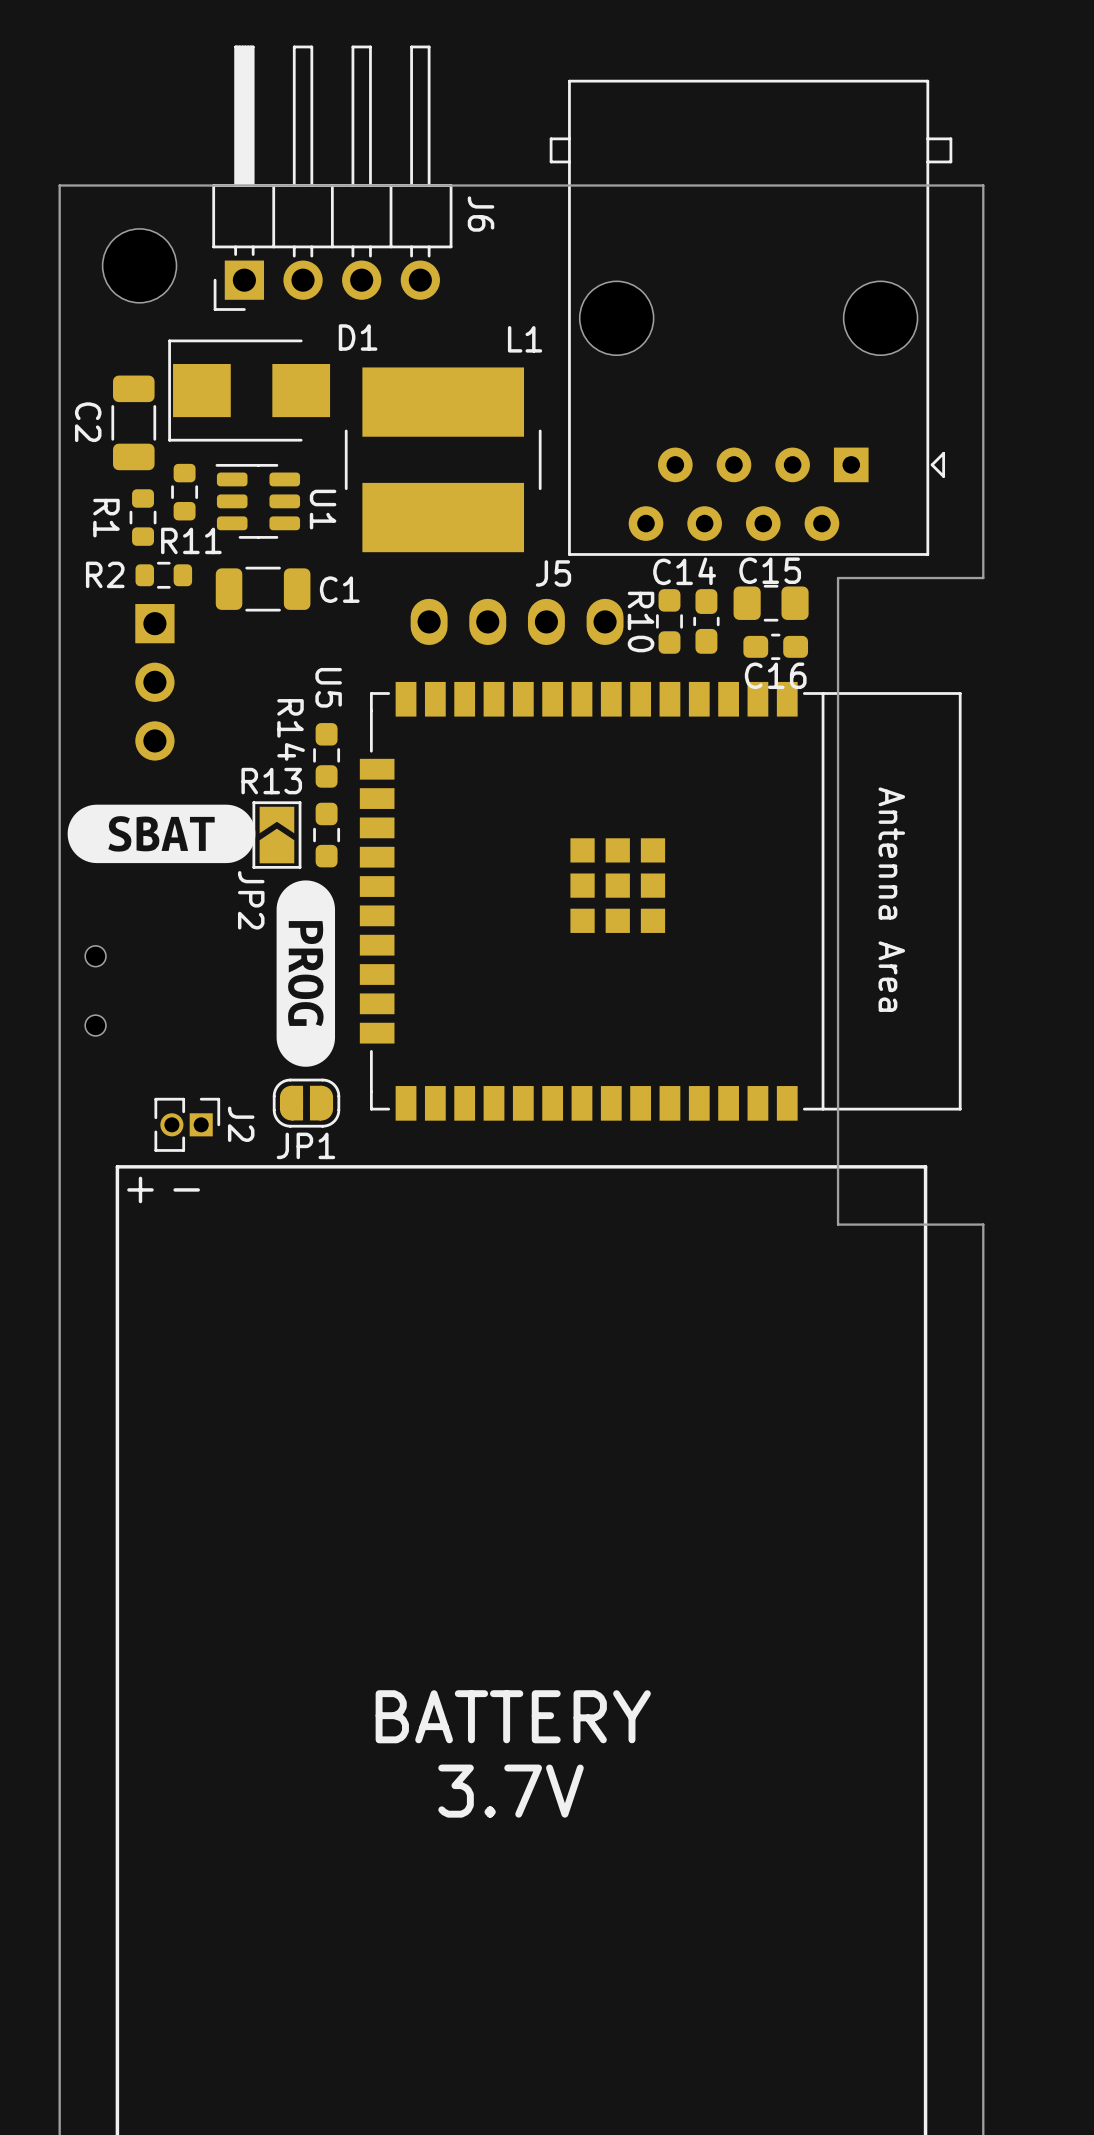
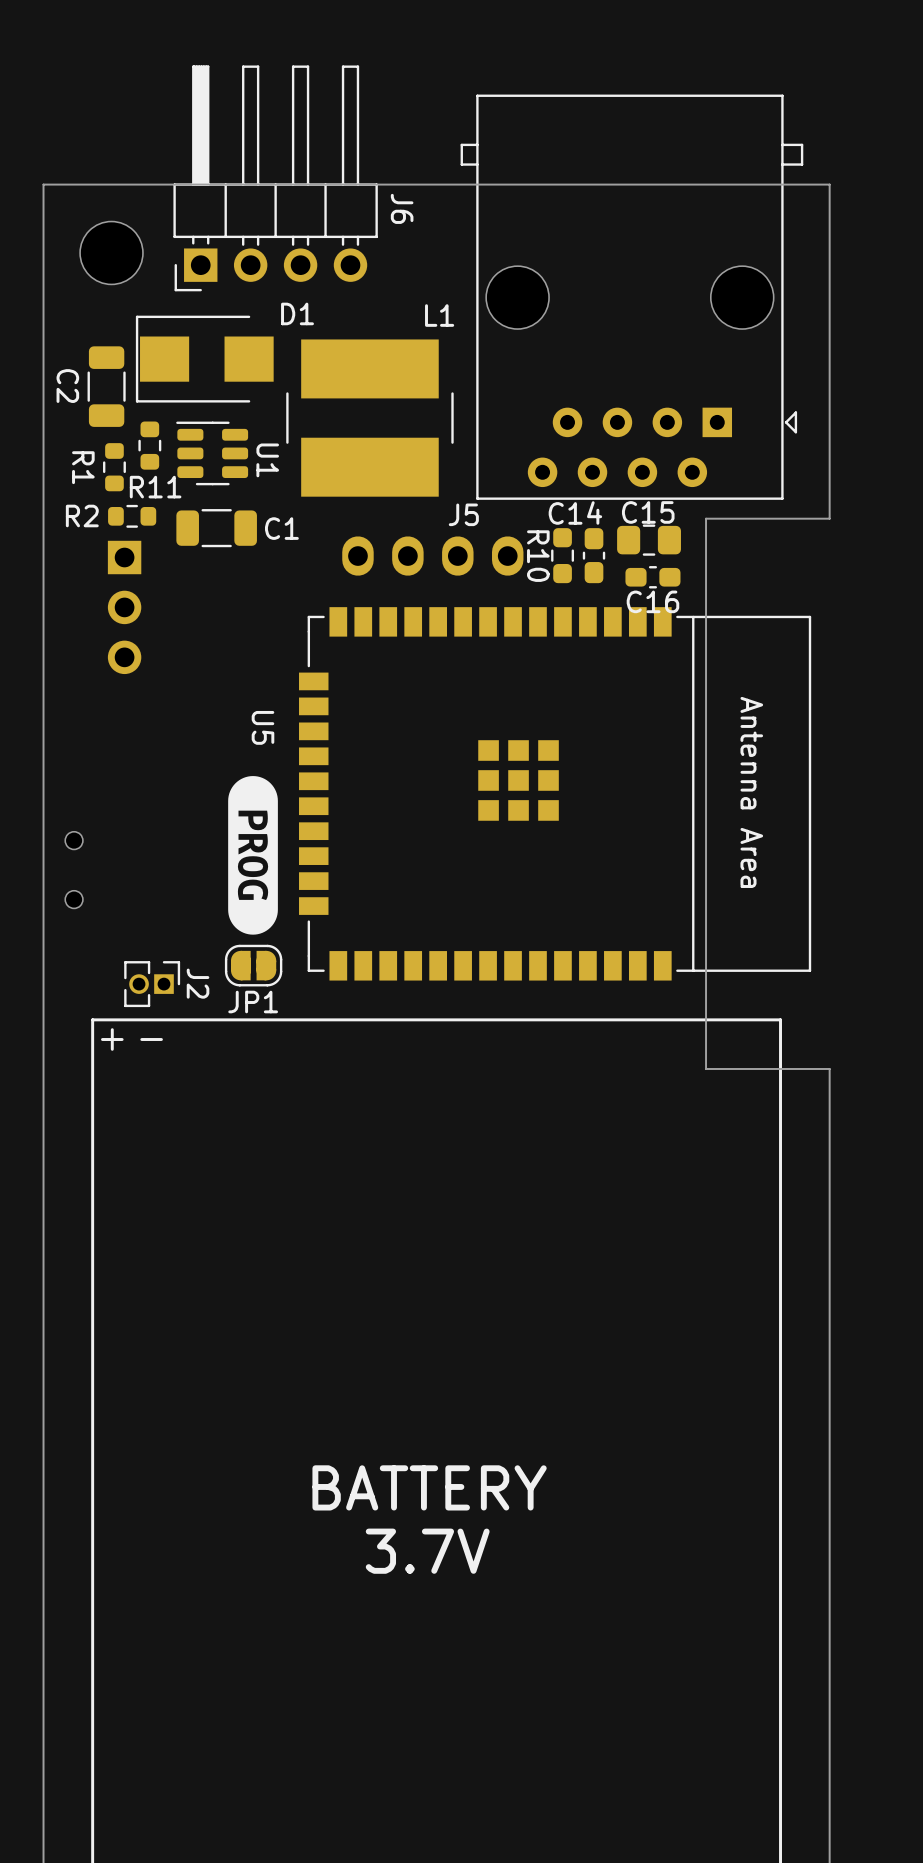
U5 name position: U5 (328, 687) -> U5 (262, 727)
R14: (326, 755) -> none
drawing: [67, 804, 256, 864] -> none
JP2: (276, 835) -> none
R13: (326, 835) -> none

